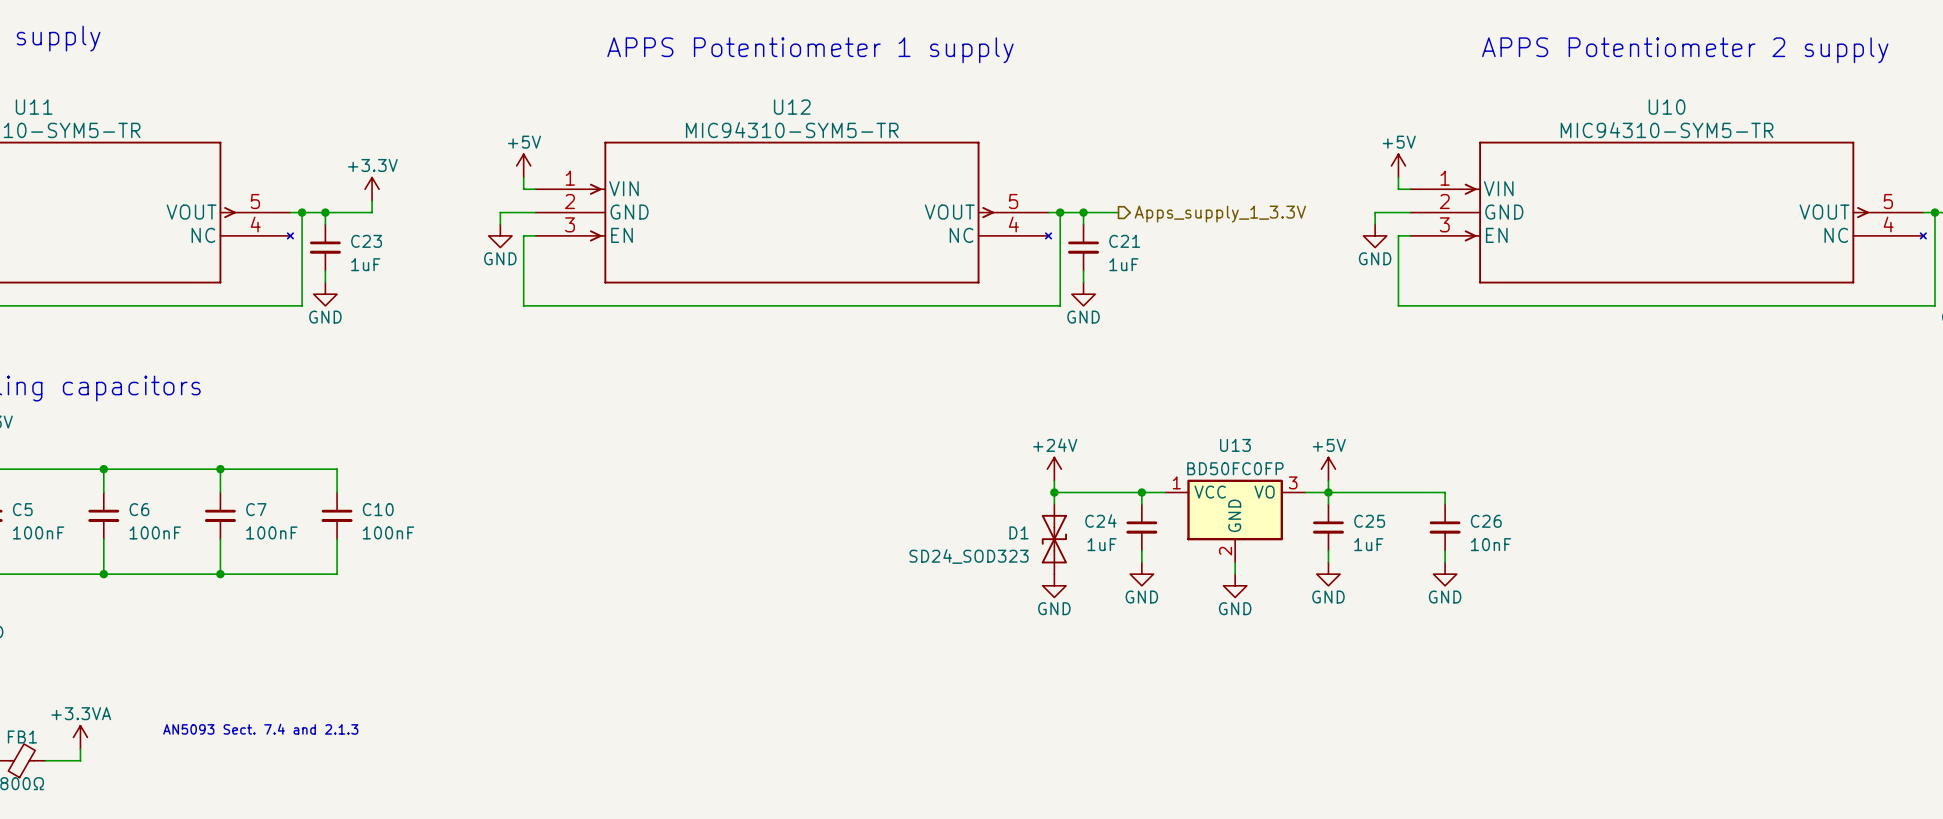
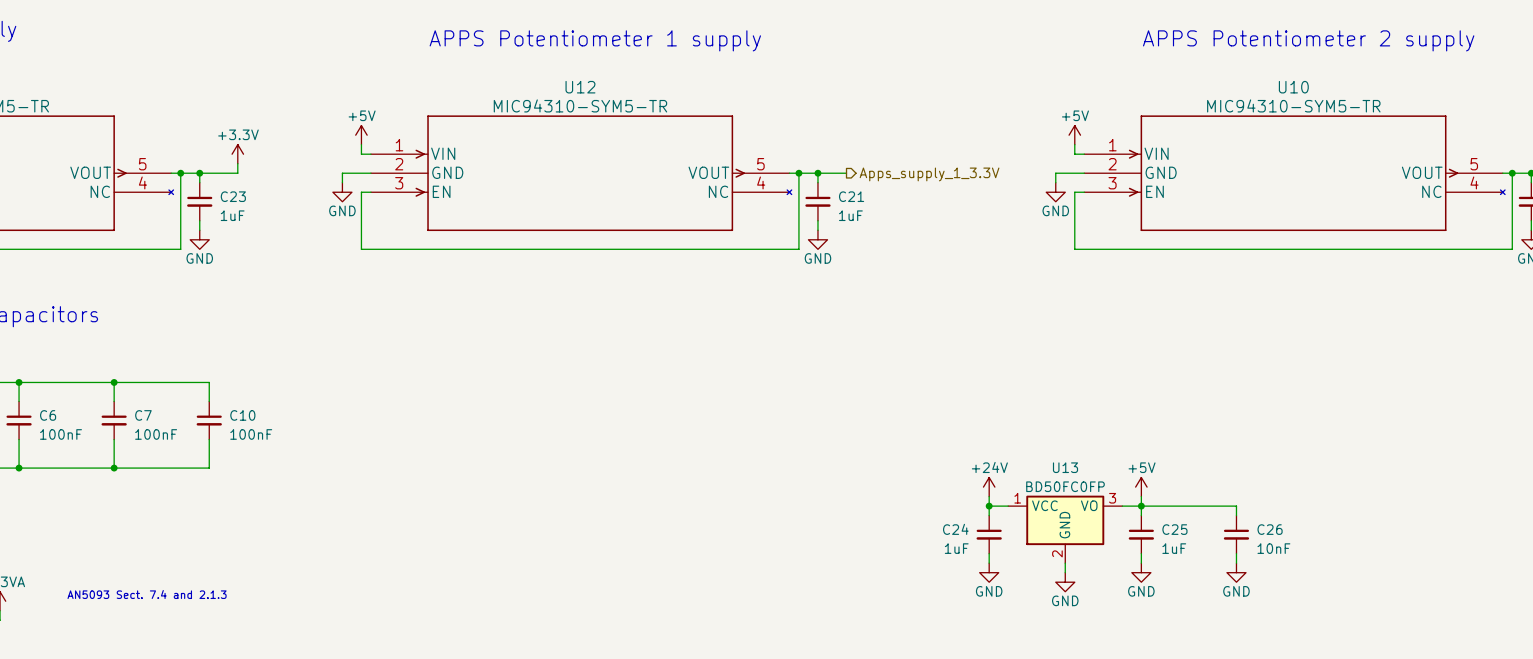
power symbol: +24V (1054, 469) -> none
power symbol position: +5V (1328, 469) -> +5V (1141, 487)
wire: (1054, 480) (1054, 504) -> none
wire: (1328, 480) (1328, 504) -> (1141, 496) (1141, 515)
wire: (1054, 492) (1165, 492) -> none
junction: (1054, 492) -> none
wire: (1141, 492) (1141, 504) -> none
junction: (1141, 492) -> none
wire: (1305, 492) (1445, 492) (1445, 504) -> (1122, 506) (1236, 506) (1236, 515)
junction: (1328, 492) -> none
U13 position: (1235, 521) -> (1065, 529)
C24 position: (1141, 527) -> (989, 534)
C25 position: (1328, 527) -> (1141, 534)
C26 position: (1445, 527) -> (1236, 534)
D1: SD24_SOD323 (1054, 539) -> none
wire: (1141, 550) (1141, 562) -> (989, 553) (989, 563)
wire: (1328, 550) (1328, 562) -> (1141, 553) (1141, 563)
wire: (1445, 550) (1445, 562) -> (1236, 553) (1236, 563)
wire: (1235, 562) (1235, 574) -> (1065, 563) (1065, 572)
power symbol: GND (1141, 574) -> none
power symbol: GND (1328, 574) -> none
power symbol: GND (1445, 574) -> none
power symbol: GND (1054, 585) -> none
power symbol: GND (1235, 585) -> none
power symbol: none -> +24V (989, 487)
wire: none -> (989, 496) (989, 515)
wire: none -> (989, 506) (1008, 506)
junction: none -> (989, 506)
junction: none -> (1141, 506)
power symbol: none -> GND (989, 572)
power symbol: none -> GND (1141, 572)
power symbol: none -> GND (1236, 572)
power symbol: none -> GND (1065, 582)

